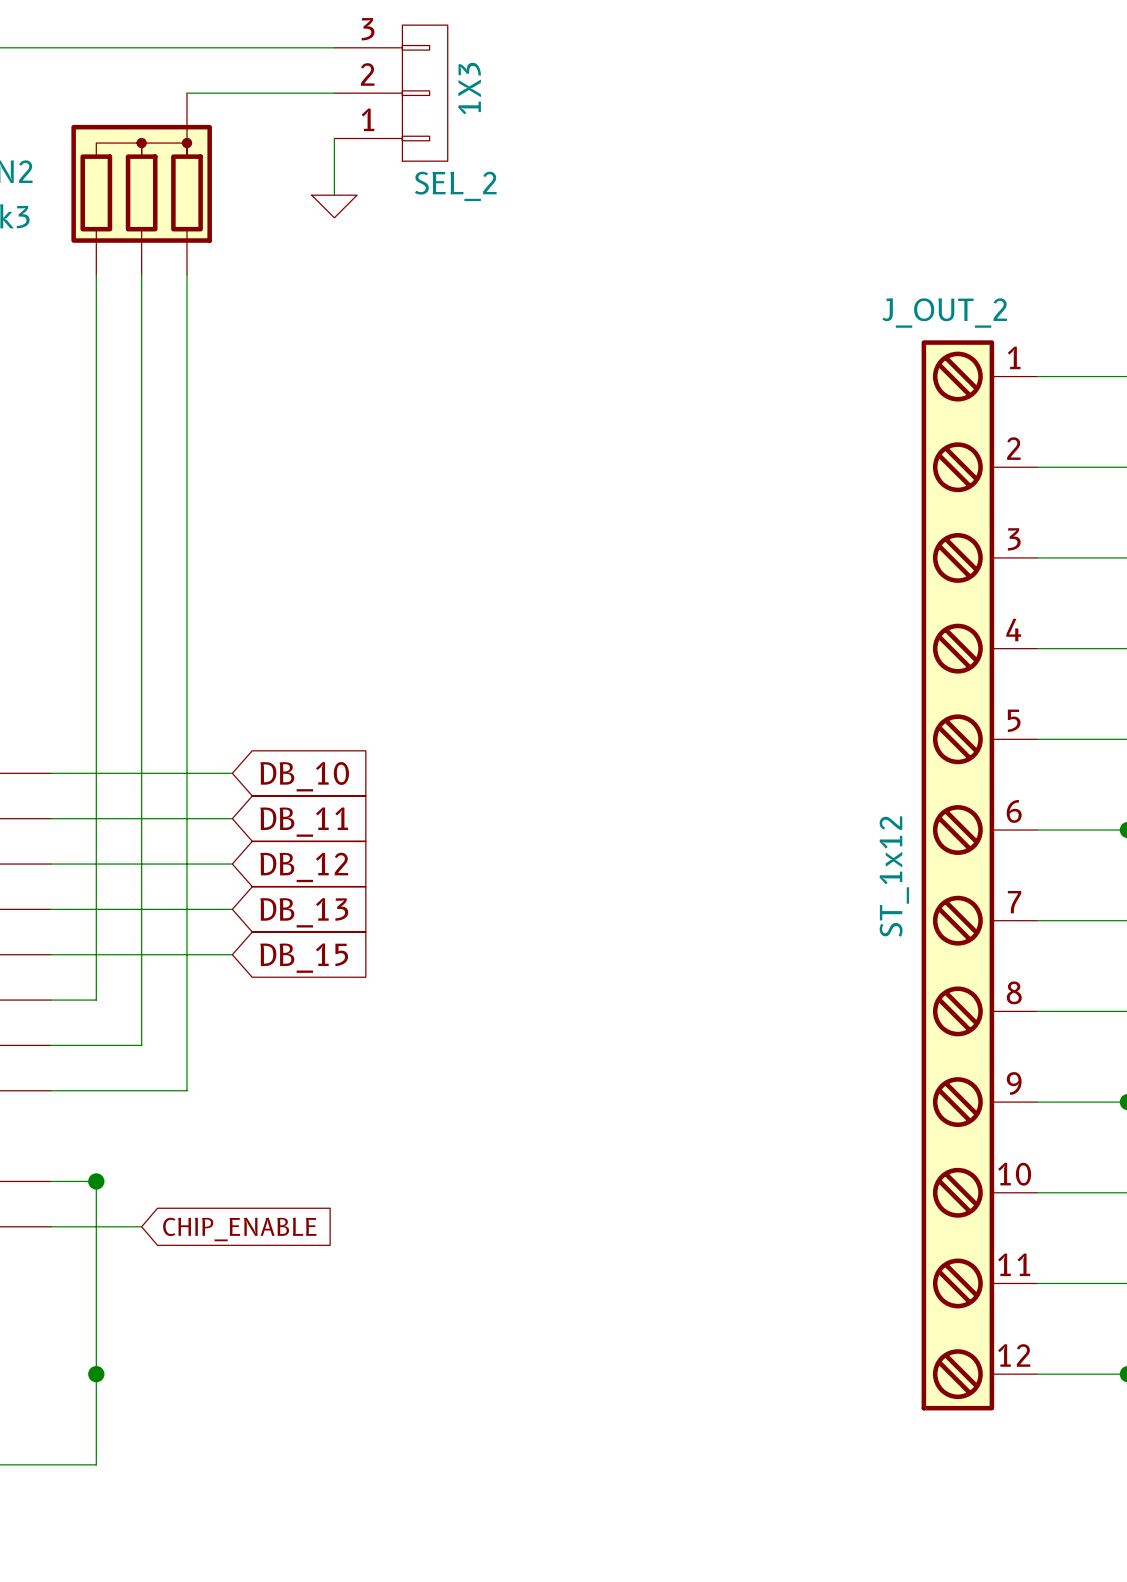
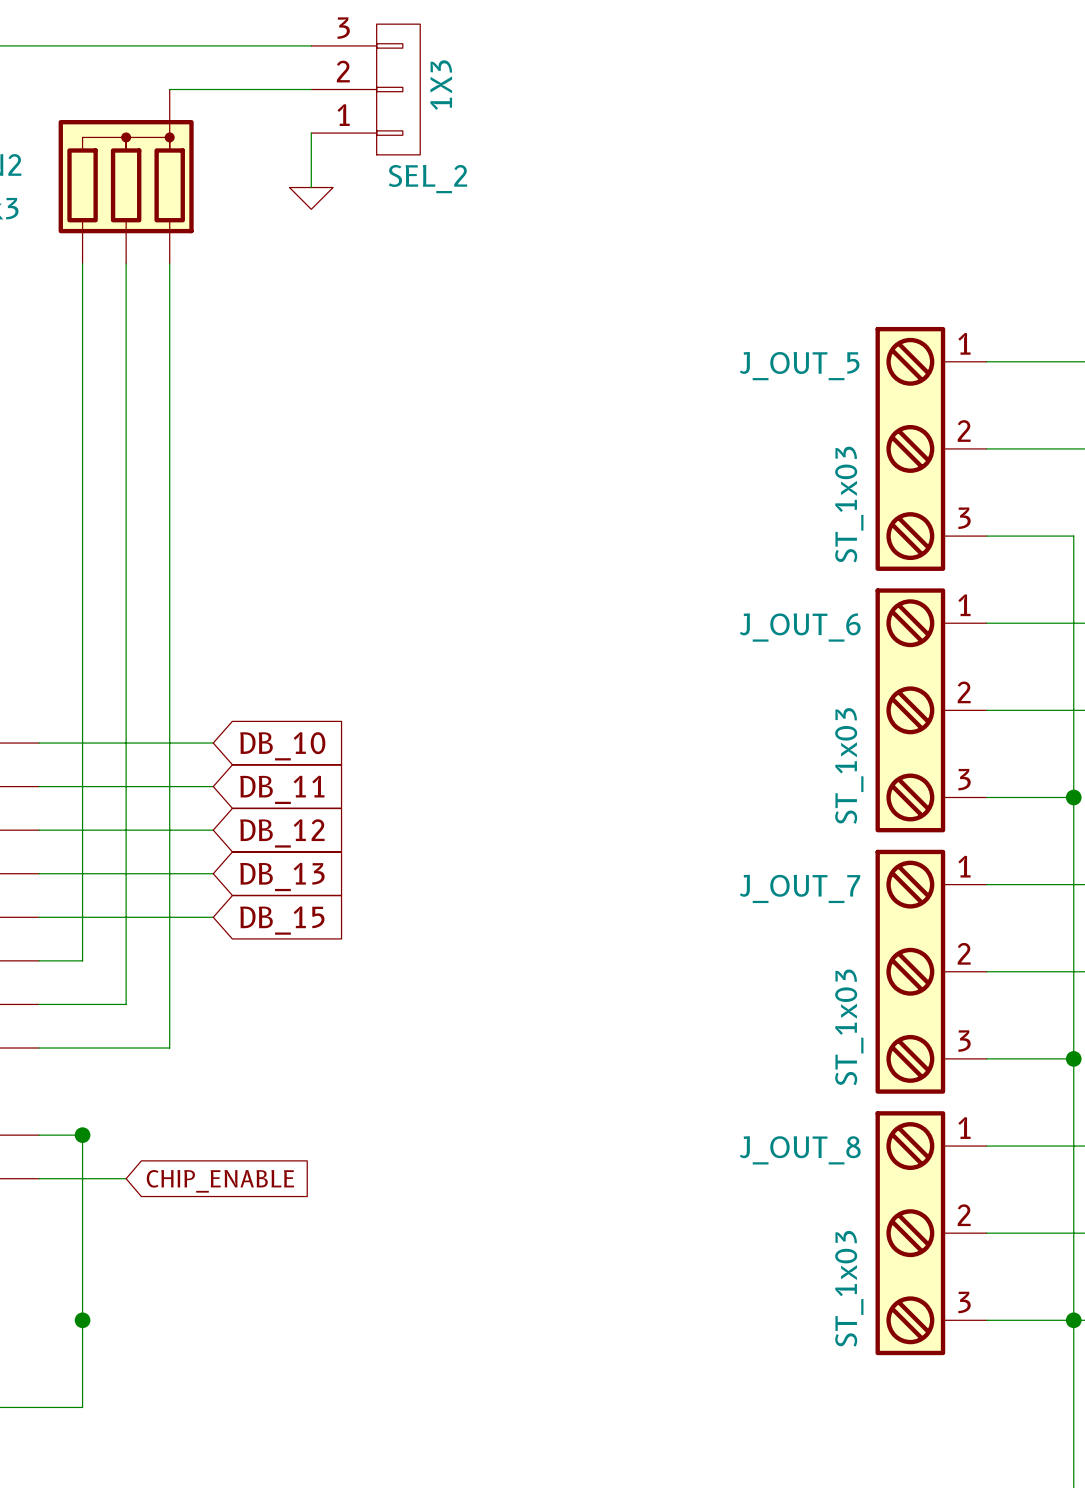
J_OUT_5: none -> ST_1x03 (931, 448)
J_OUT_6: none -> ST_1x03 (931, 710)
J_OUT_2: ST_1x12 (979, 875) -> none
J_OUT_7: none -> ST_1x03 (931, 971)
J_OUT_8: none -> ST_1x03 (931, 1233)

